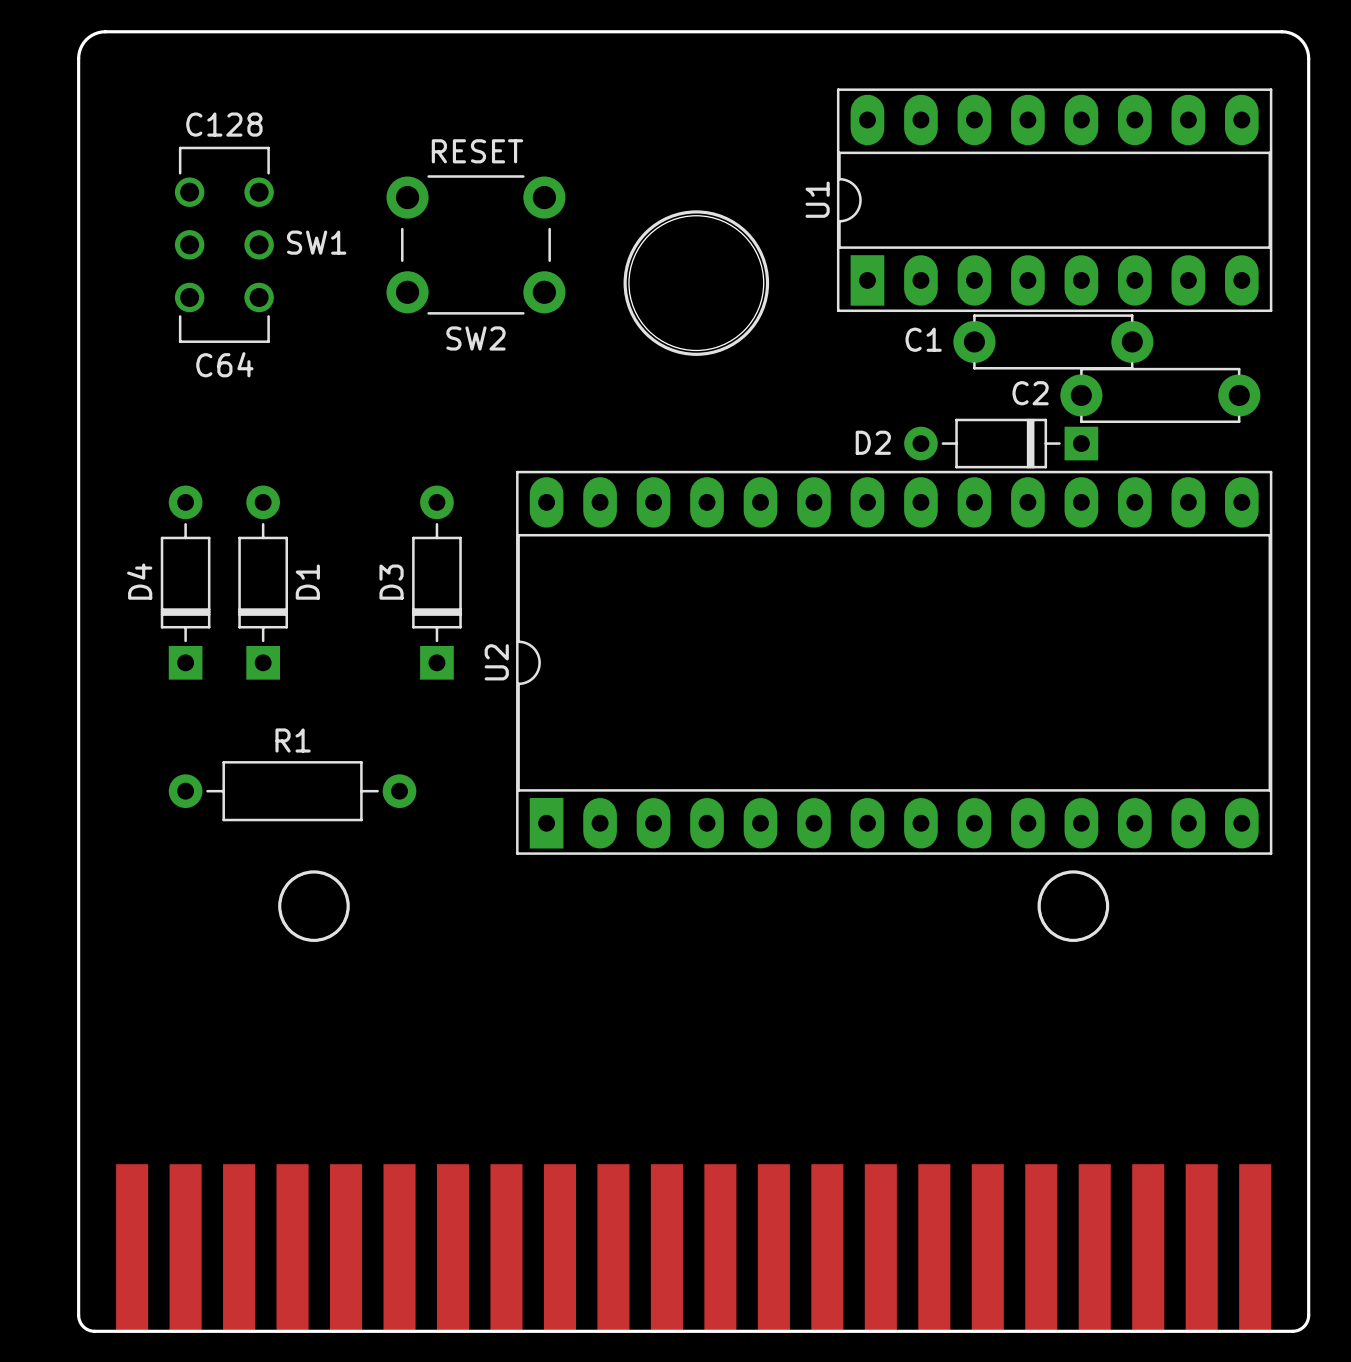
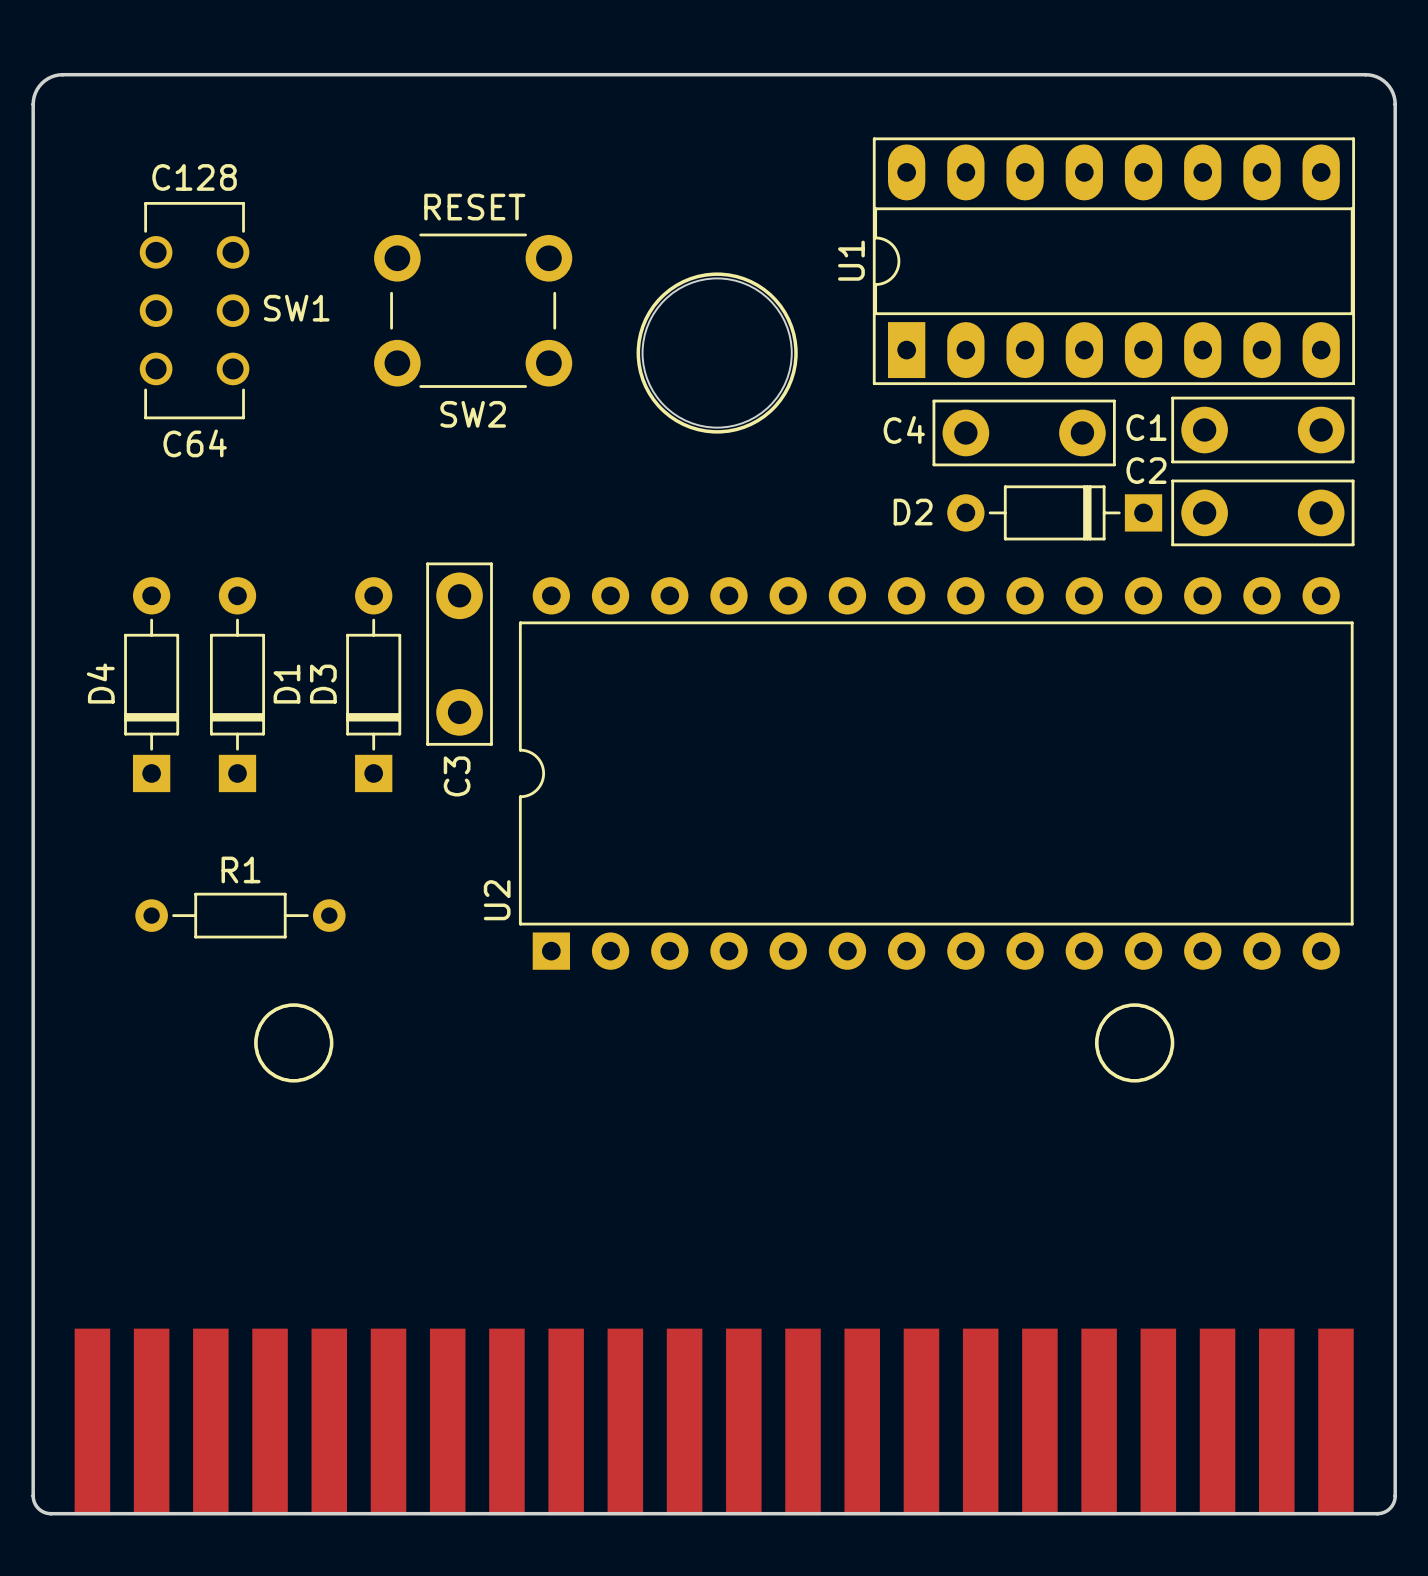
C1 footprint: [953, 314, 1154, 370] -> [1171, 396, 1355, 464]
C4: none -> (1024, 432)
C2 footprint: [1060, 367, 1261, 424] -> [1171, 479, 1355, 547]
C2 name position: C2 (1030, 393) -> C2 (1146, 470)
D2 position: (1001, 443) -> (1054, 512)
U2 footprint: [516, 470, 1273, 855] -> [518, 577, 1354, 970]
C3: none -> (459, 654)
D3 position: (436, 582) -> (373, 684)
U2 name position: U2 (496, 662) -> U2 (497, 900)
R1 footprint: [168, 761, 417, 822] -> [135, 892, 346, 939]

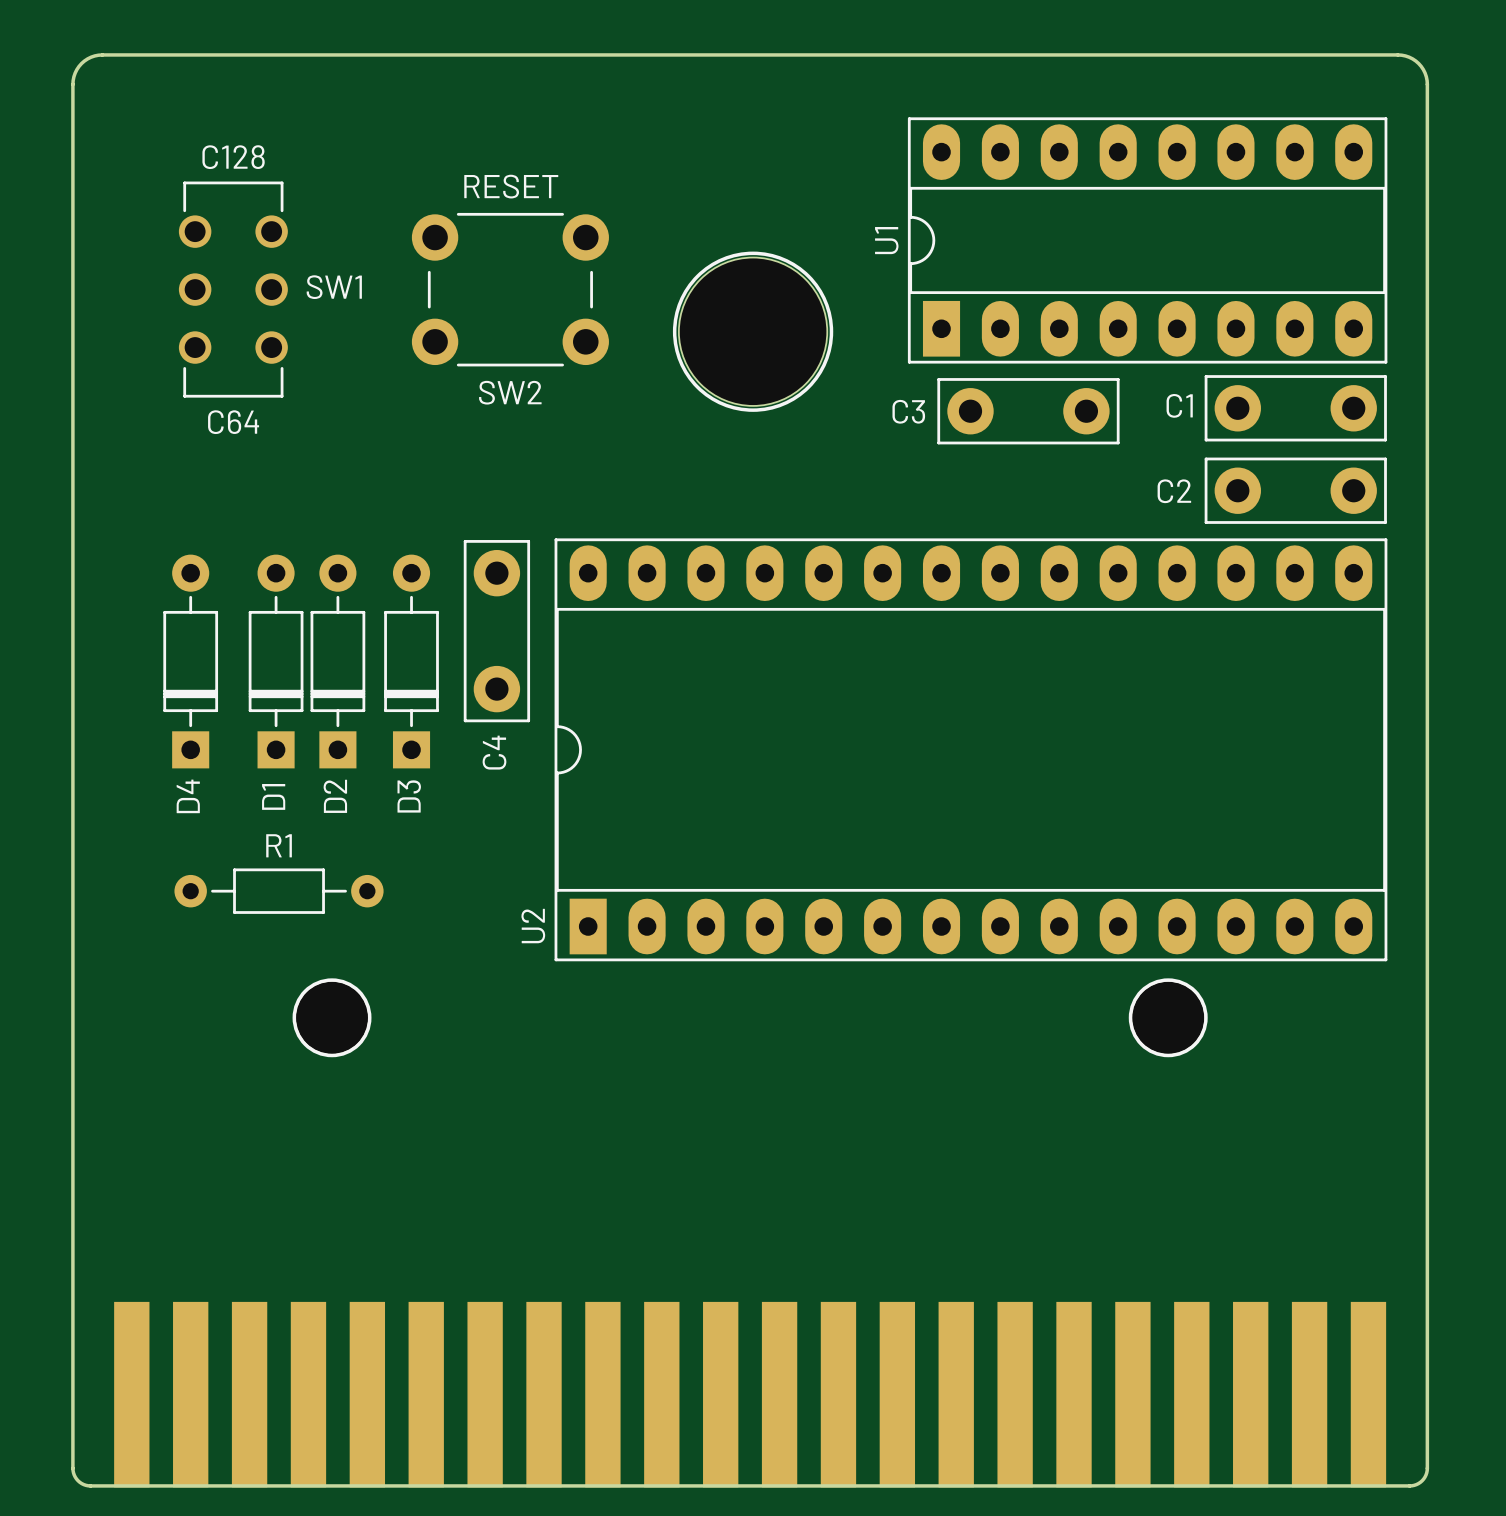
C3: none -> (1028, 411)
C4: (1024, 432) -> none
C2 name position: C2 (1146, 470) -> C2 (1174, 491)
D2 name position: D2 (913, 512) -> D2 (335, 796)
D2 rotation: 0° (1054, 512) -> 90° clockwise (337, 661)
D2 position: (1054, 512) -> (337, 661)
U2 footprint: [518, 577, 1354, 970] -> [554, 538, 1388, 962]
D4 name position: D4 (100, 683) -> D4 (188, 796)
D1 name position: D1 (286, 684) -> D1 (273, 796)
D3 name position: D3 (323, 684) -> D3 (409, 796)
C3 name: C3 (457, 776) -> C4 (494, 752)
U2 name position: U2 (497, 900) -> U2 (533, 926)

